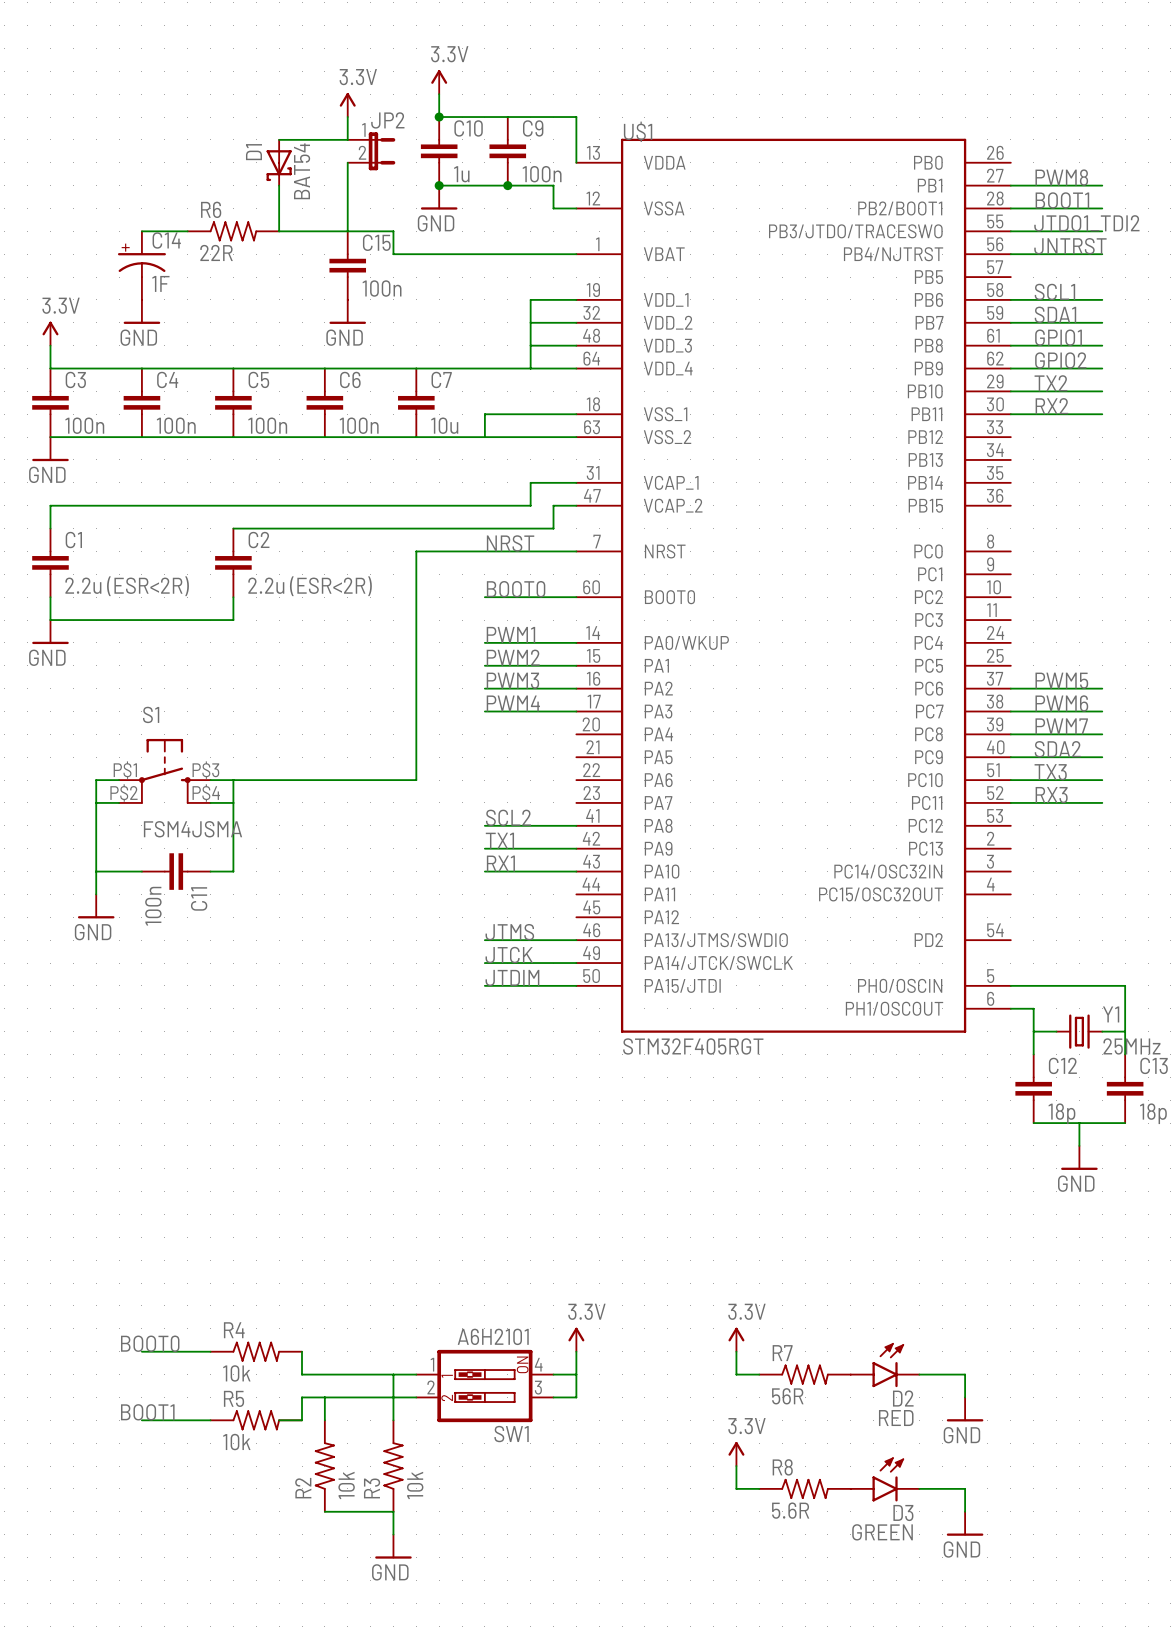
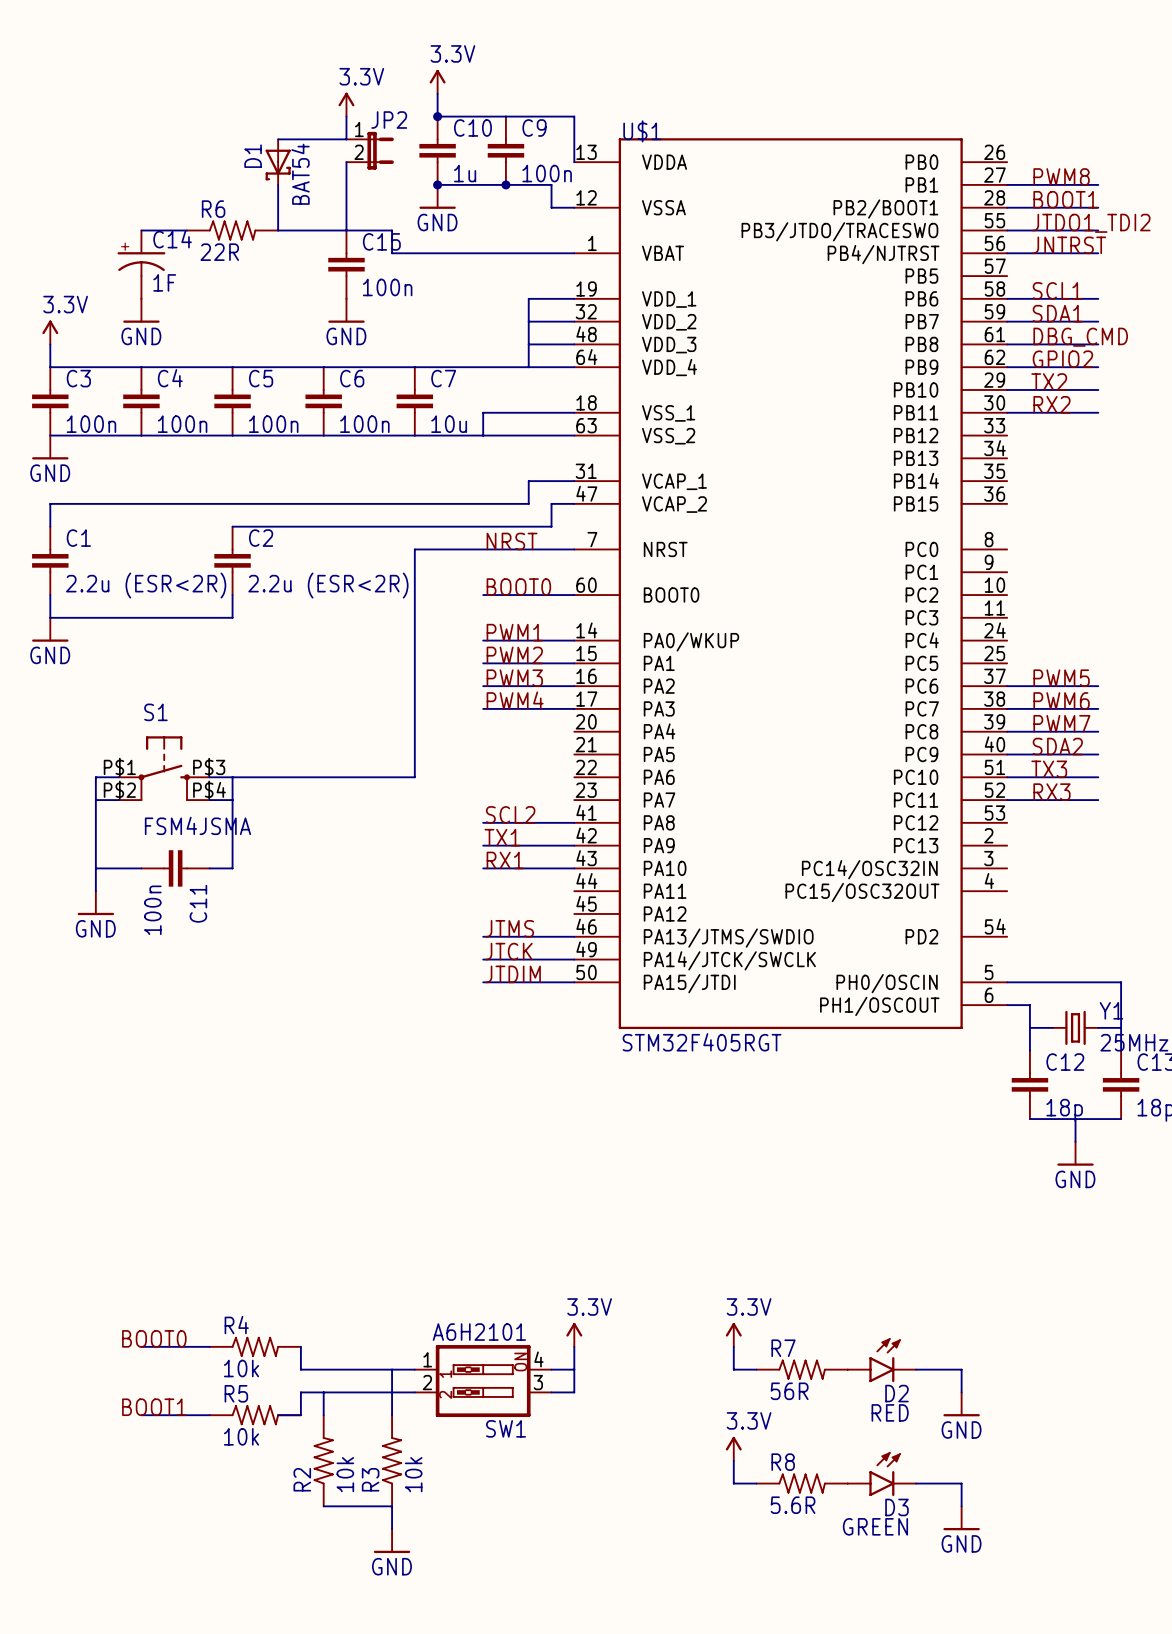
label: GPIO1 (1058, 337) -> DBG_CMD (1080, 337)

